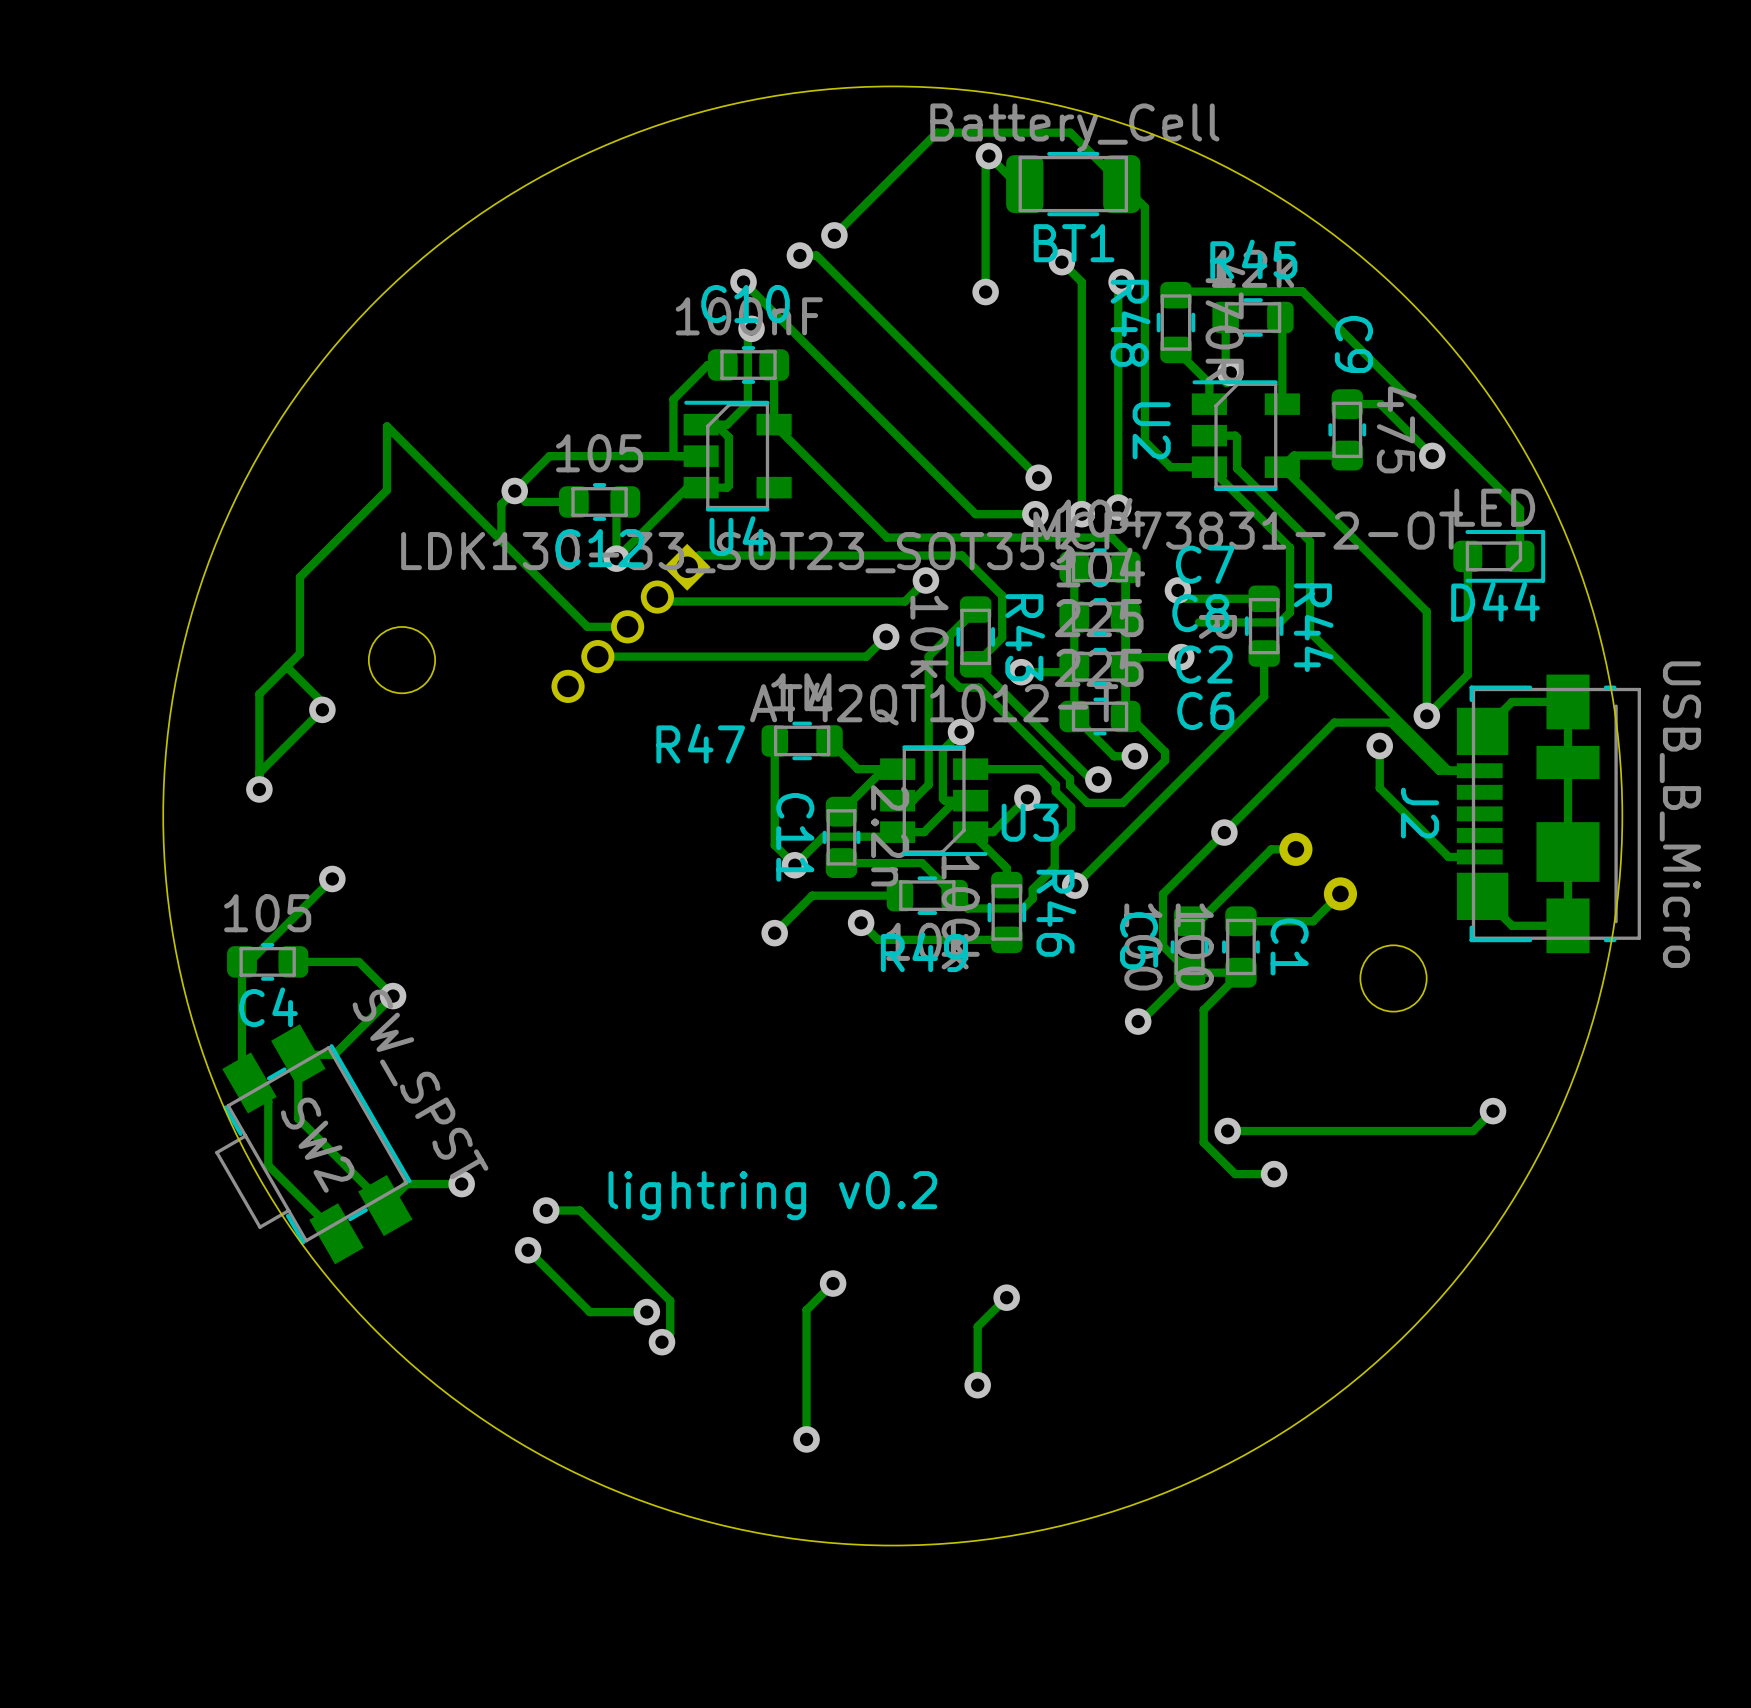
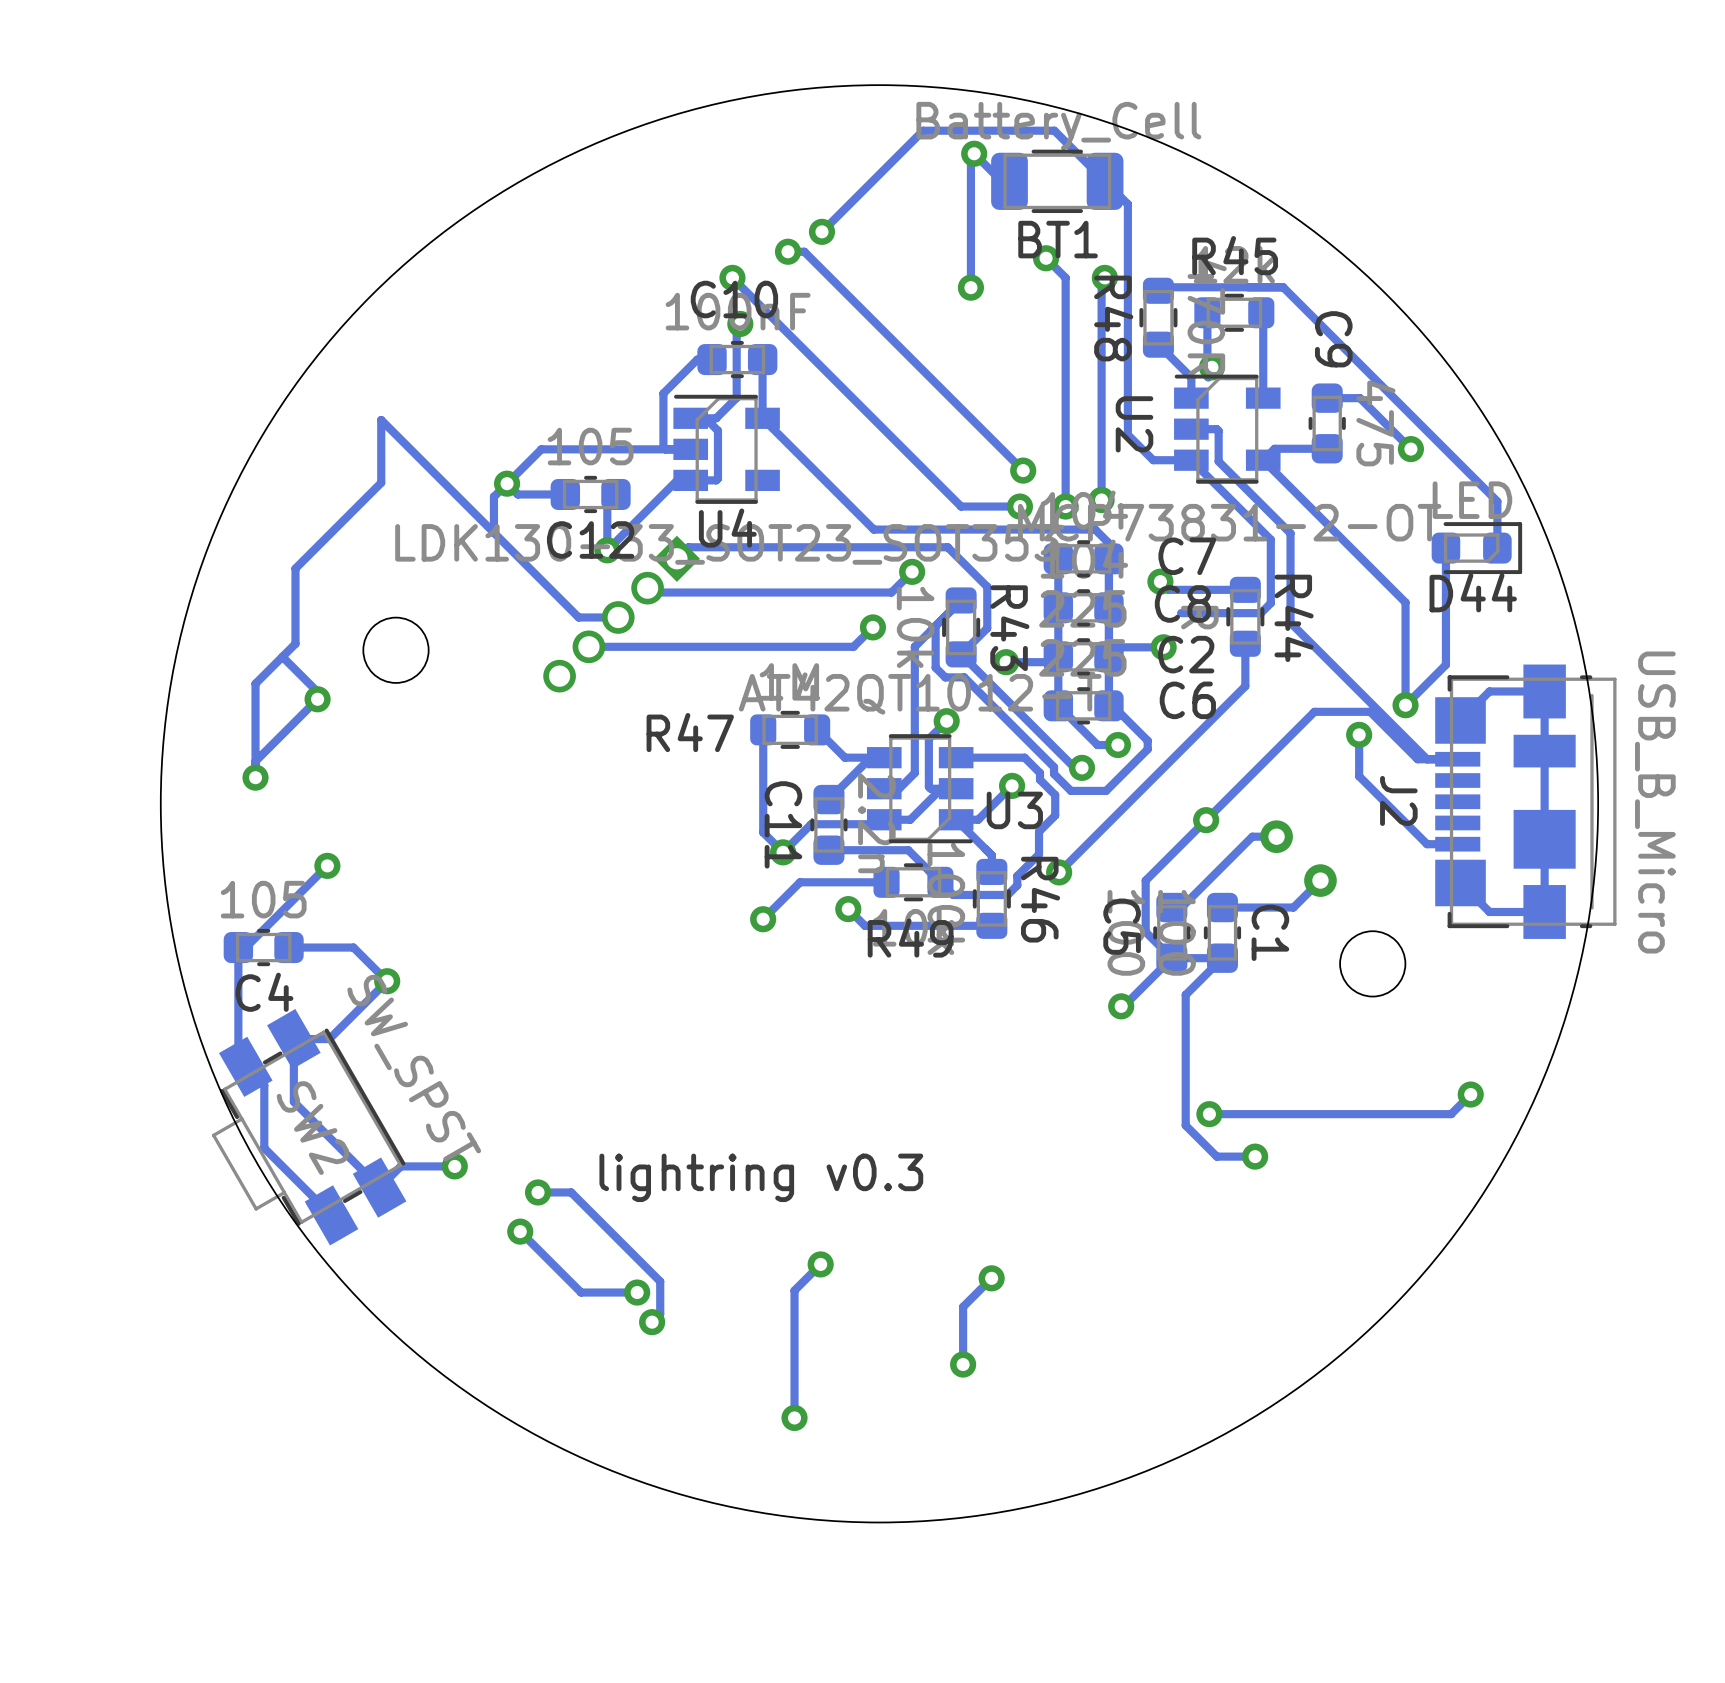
text: lightring v0.2 (772, 1195) -> lightring v0.3 (761, 1177)

